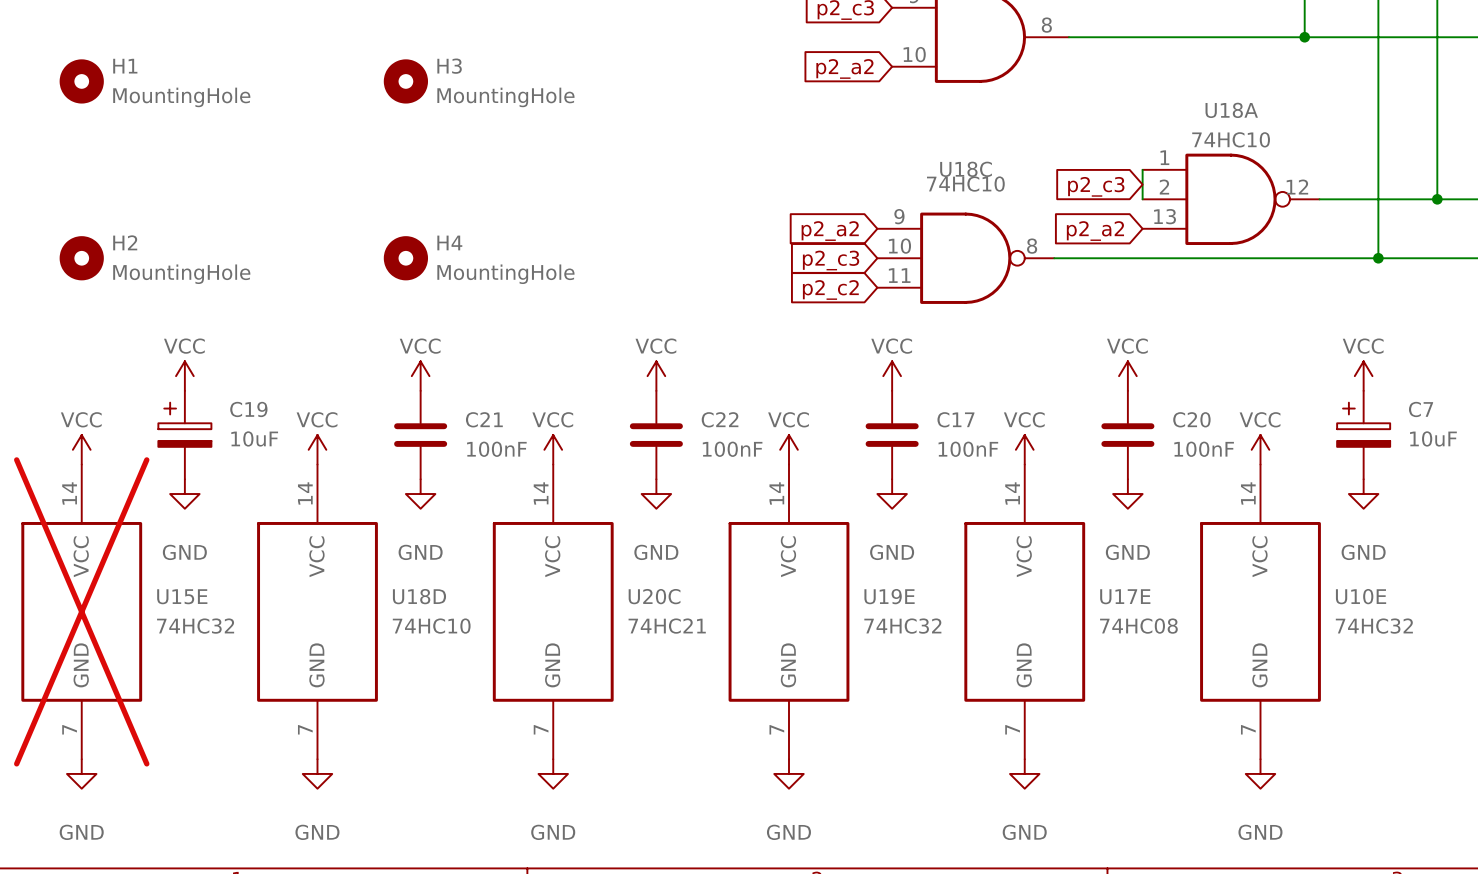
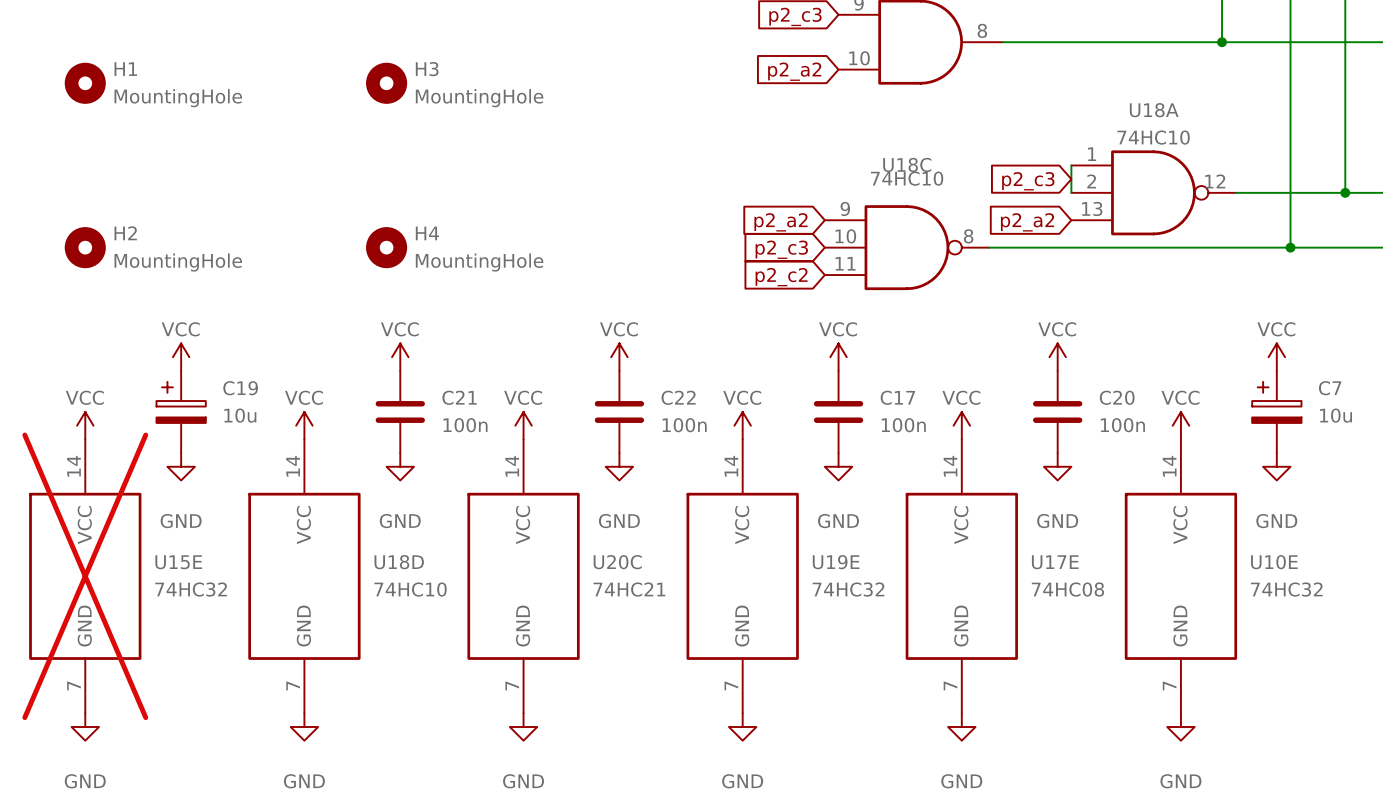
C19 value: 10uF (254, 438) -> 10u (240, 415)
C7 value: 10uF (1433, 438) -> 10u (1335, 415)
C21 value: 100nF (496, 449) -> 100n (465, 425)
C22 value: 100nF (732, 449) -> 100n (684, 425)
C17 value: 100nF (968, 449) -> 100n (903, 425)
C20 value: 100nF (1204, 449) -> 100n (1122, 425)

